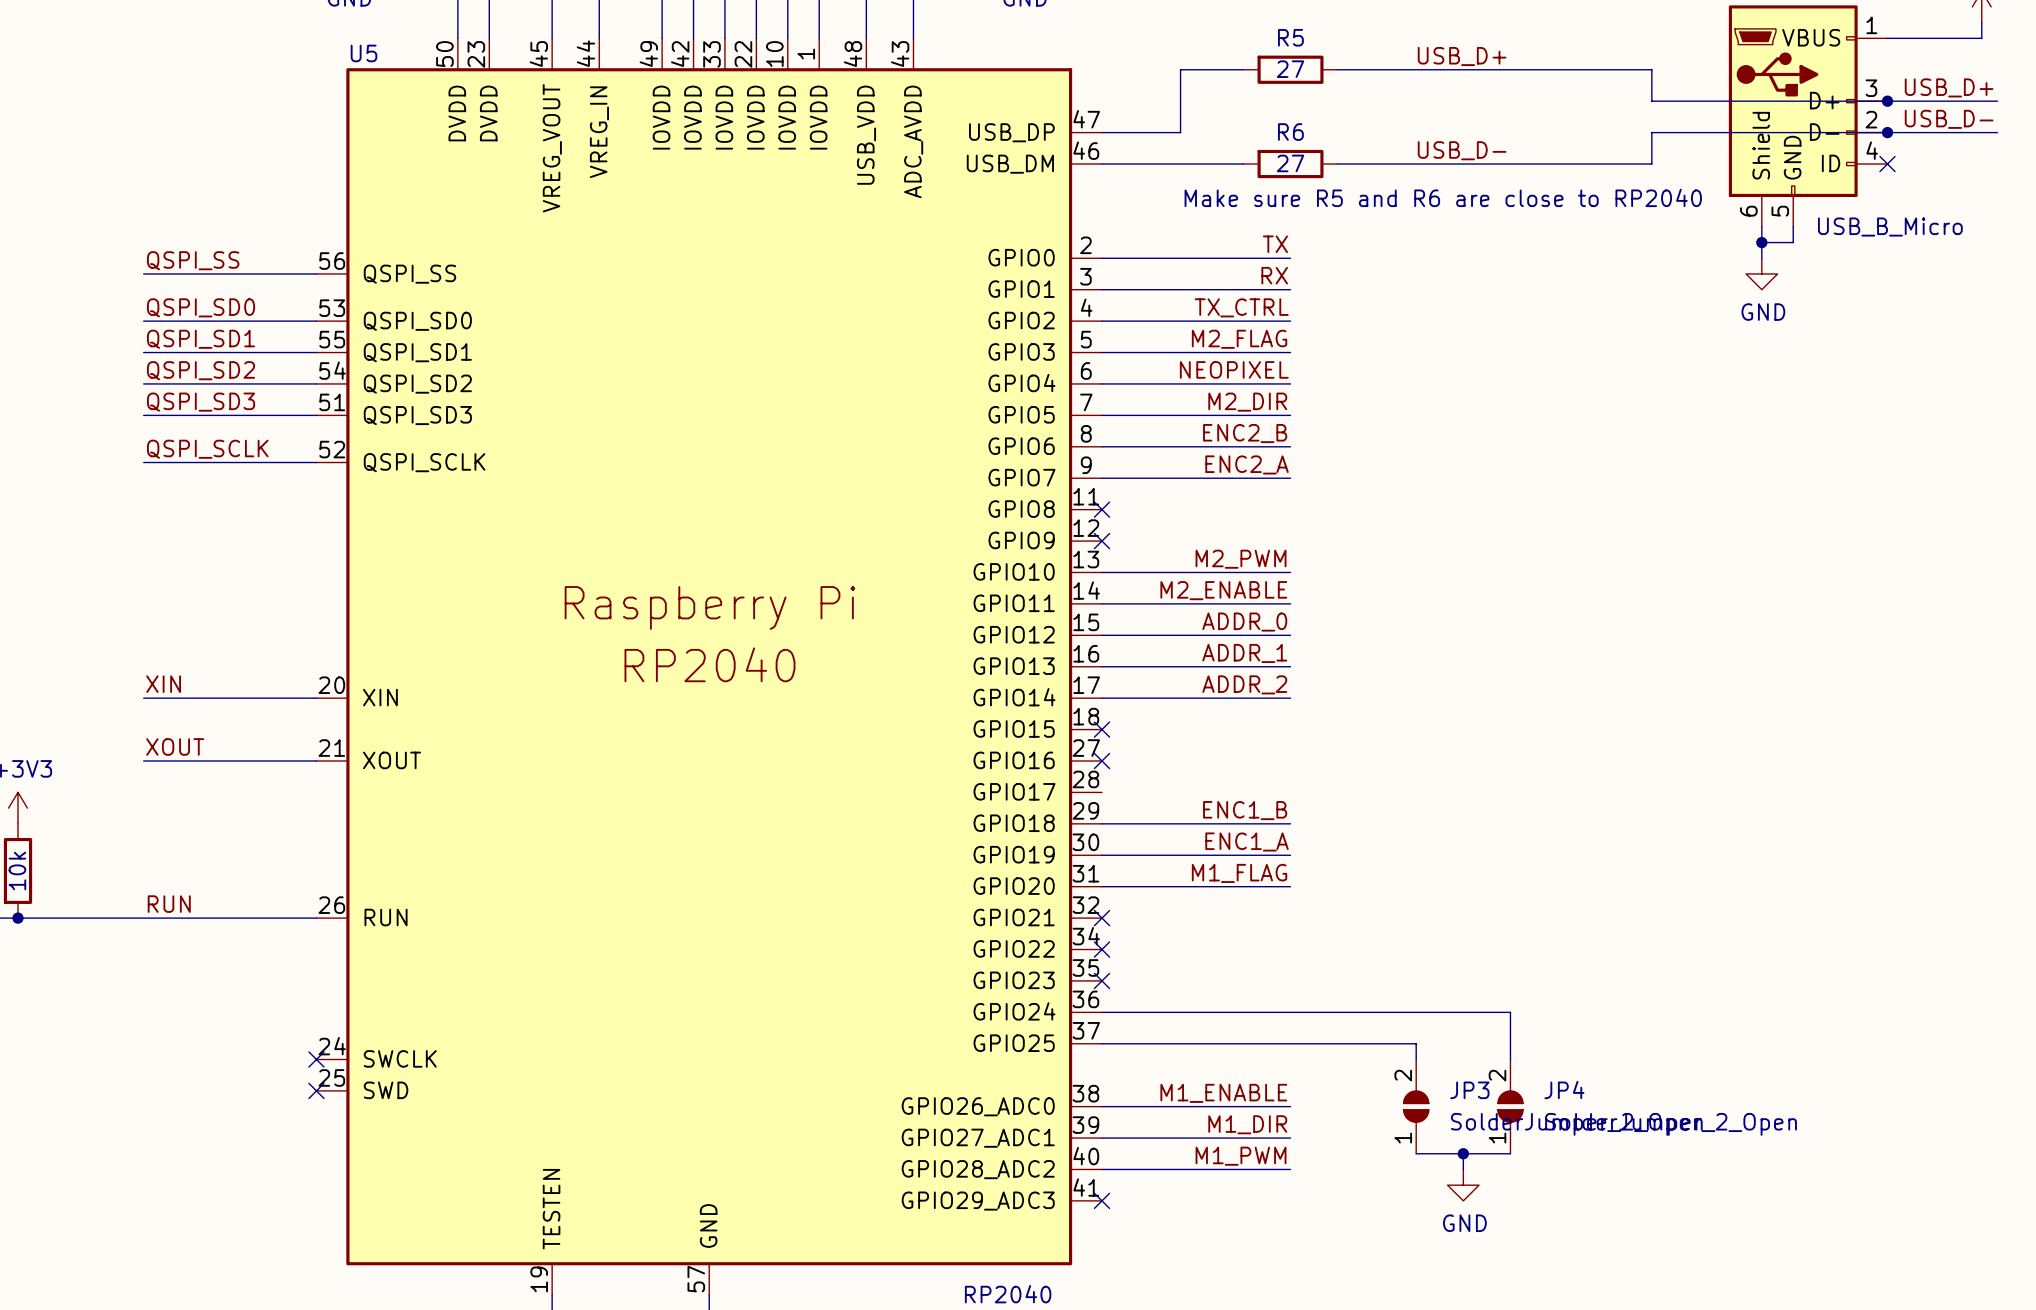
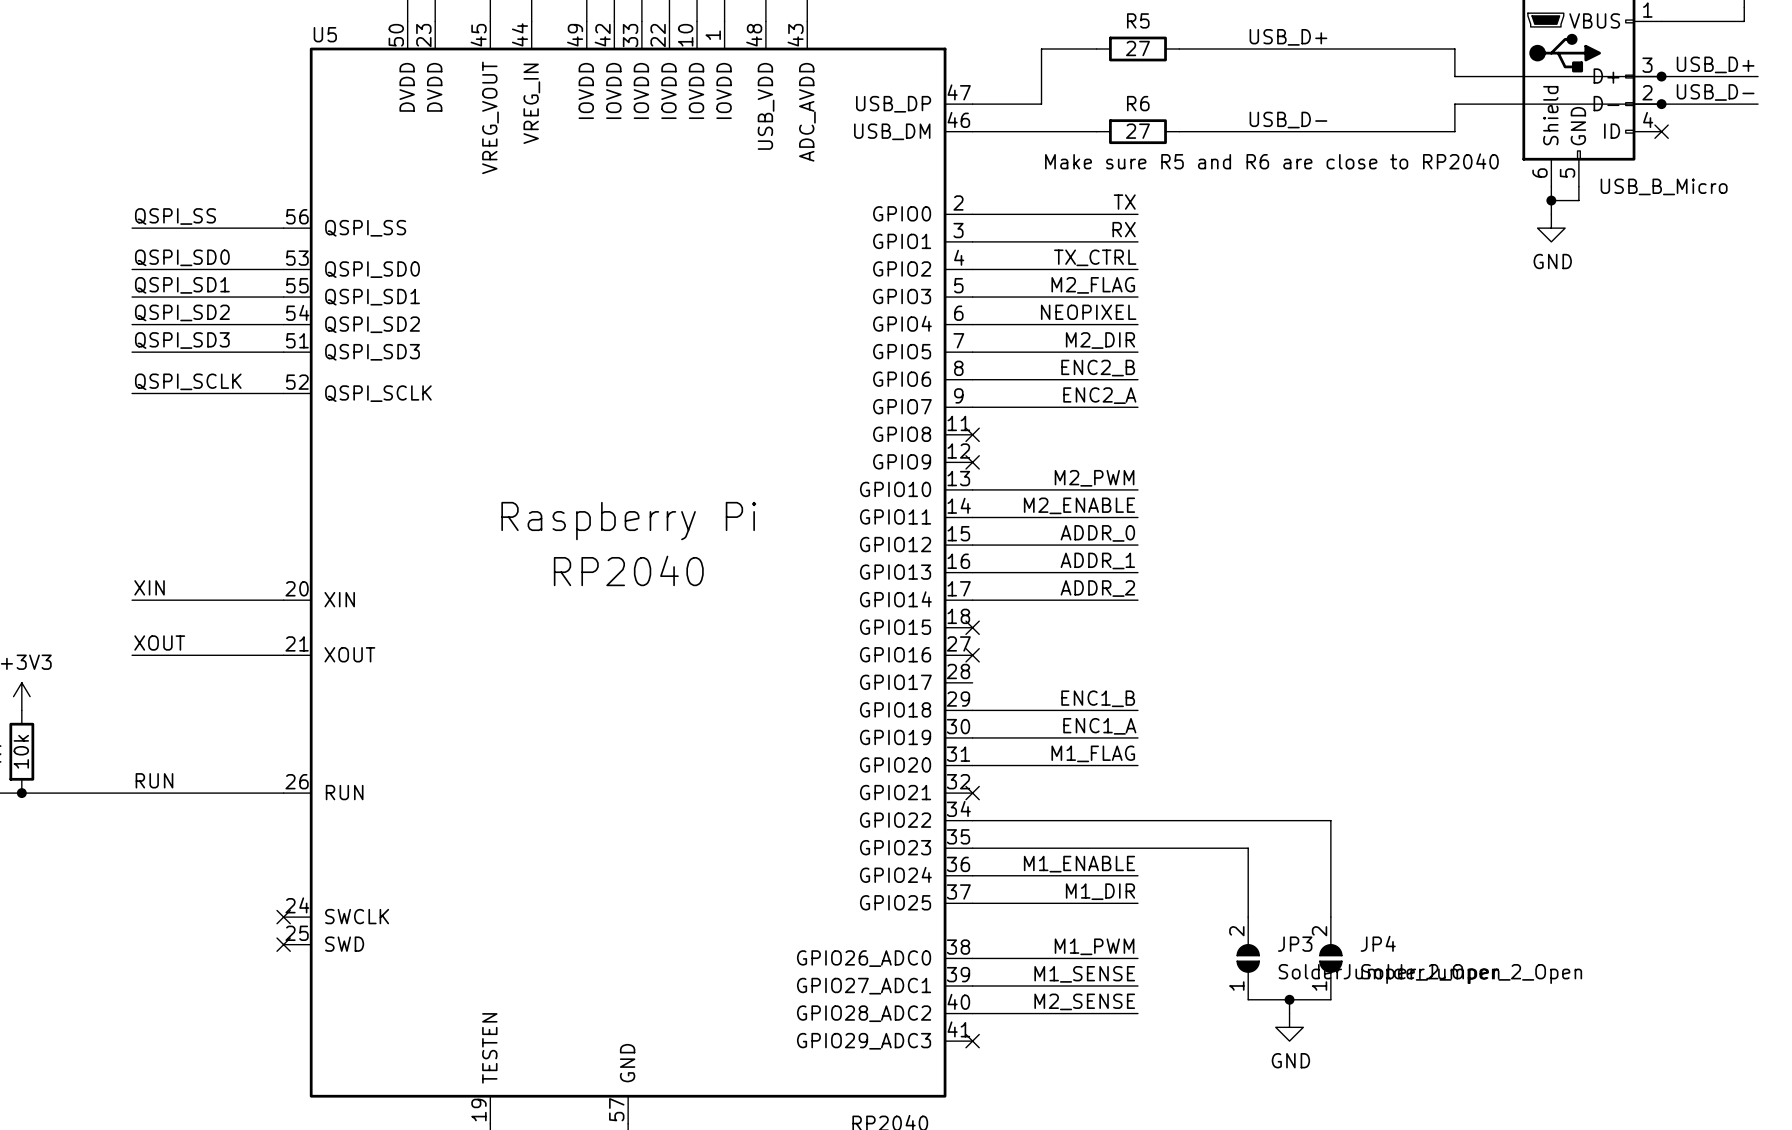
no-connect mark: (1101, 949) -> none
no-connect mark: (1101, 980) -> none
label: none -> M1_ENABLE (1079, 864)
wire: (1290, 1012) (1510, 1012) -> (972, 820) (1330, 820) (1330, 875)
label: none -> M1_DIR (1100, 891)
wire: (1290, 1043) (1416, 1043) -> (972, 848) (1248, 848) (1248, 903)
label: M1_ENABLE (1223, 1093) -> M1_PWM (1094, 946)
label: M1_DIR (1247, 1124) -> M1_SENSE (1084, 974)
label: M1_PWM (1241, 1156) -> M2_SENSE (1084, 1001)

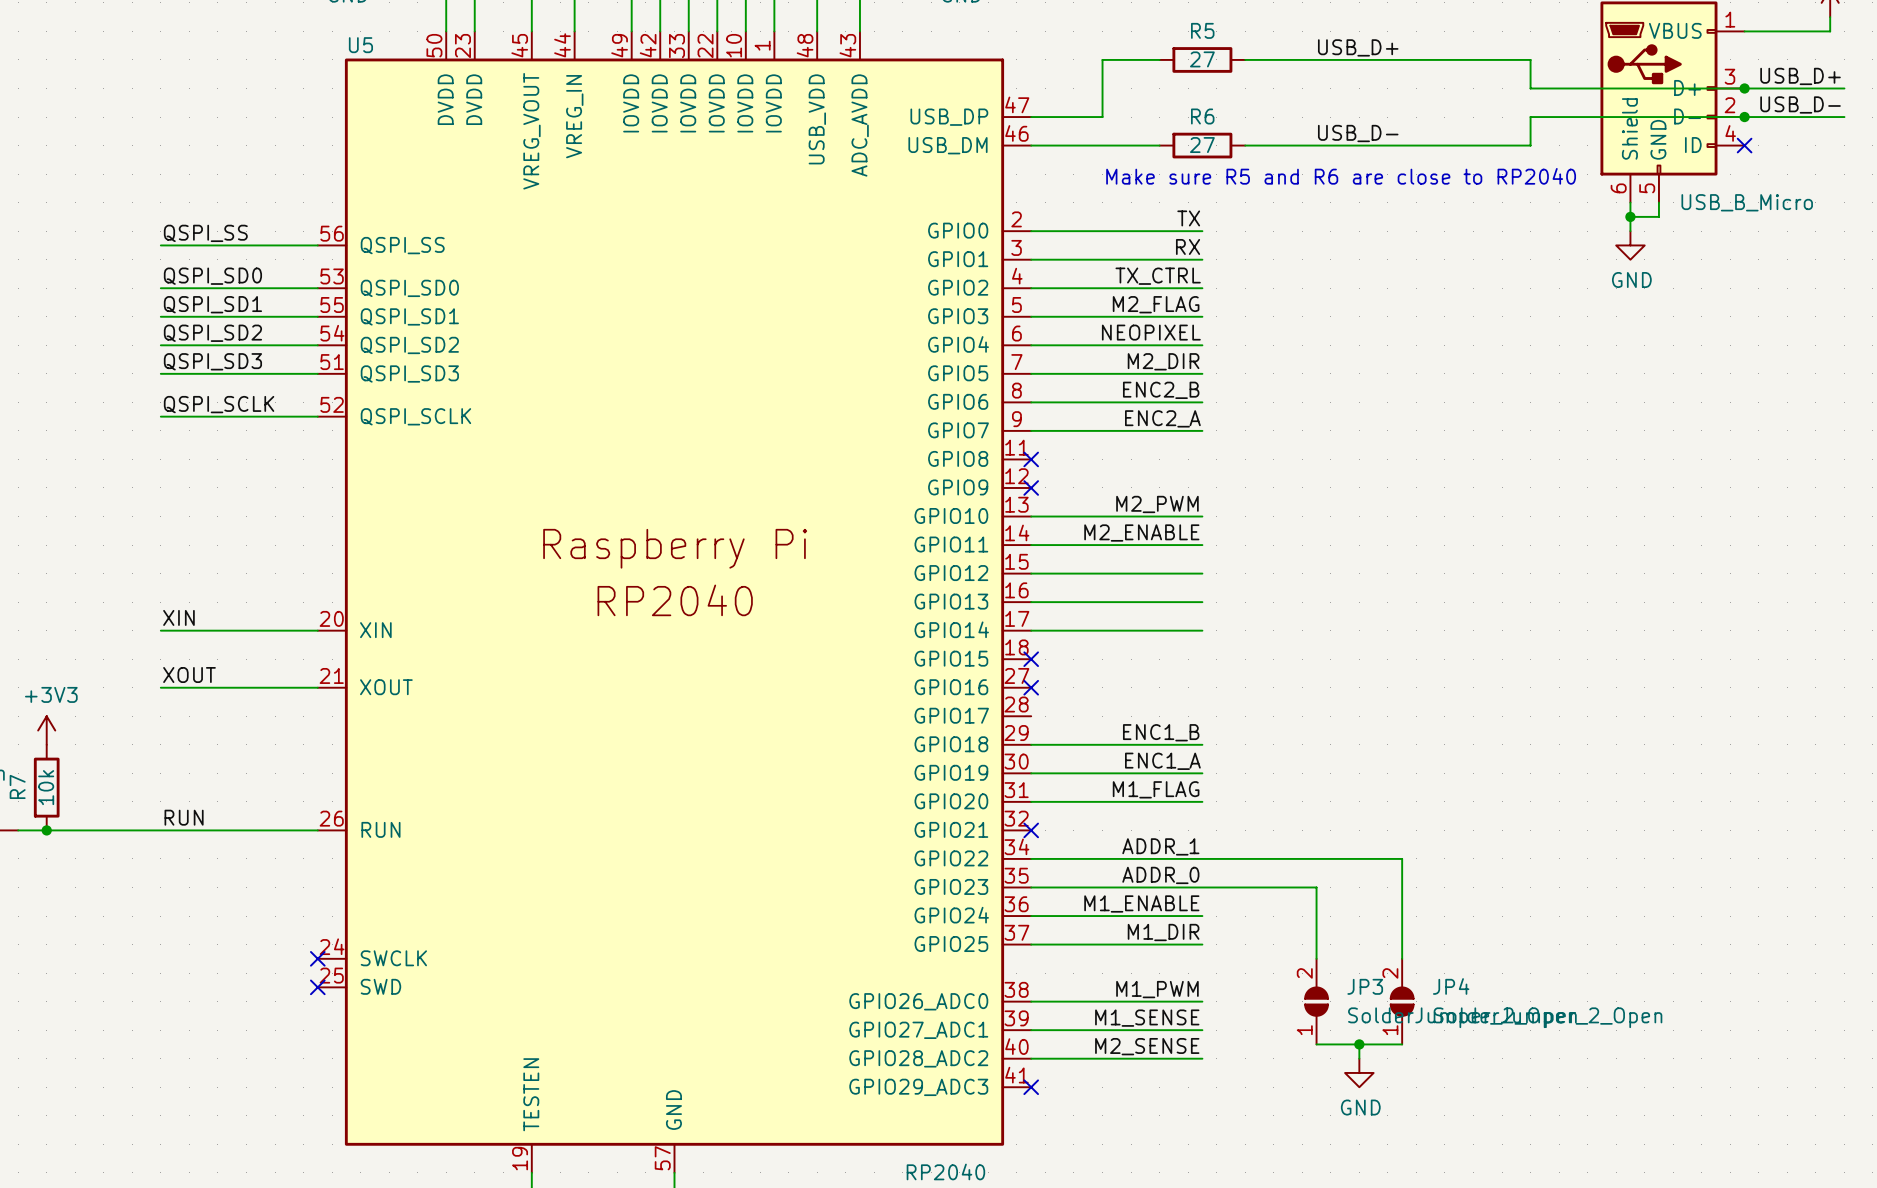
label: ADDR_0 (1097, 533) -> none
label position: ADDR_1 (1097, 560) -> ADDR_1 (1160, 846)
label: ADDR_2 (1097, 588) -> none
label: none -> ADDR_0 (1160, 875)

